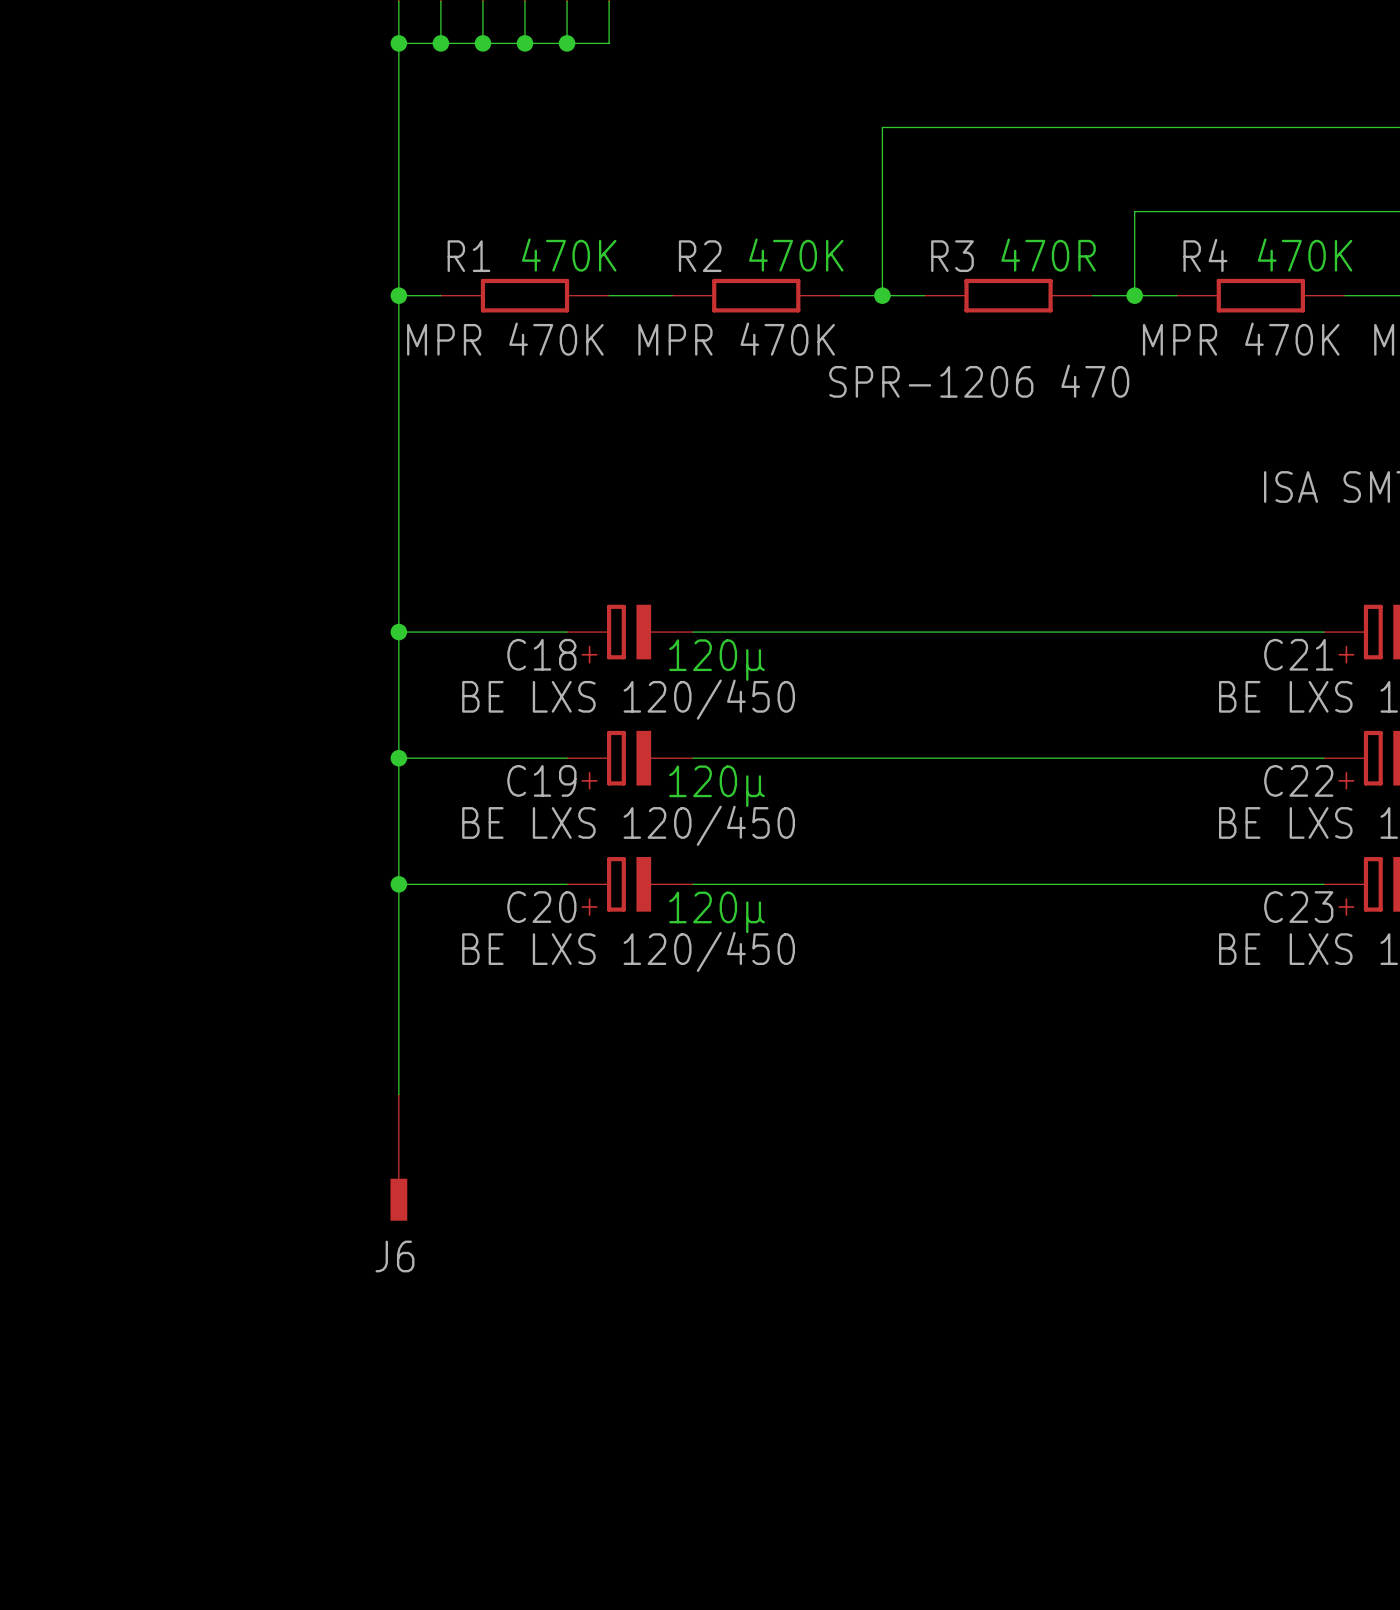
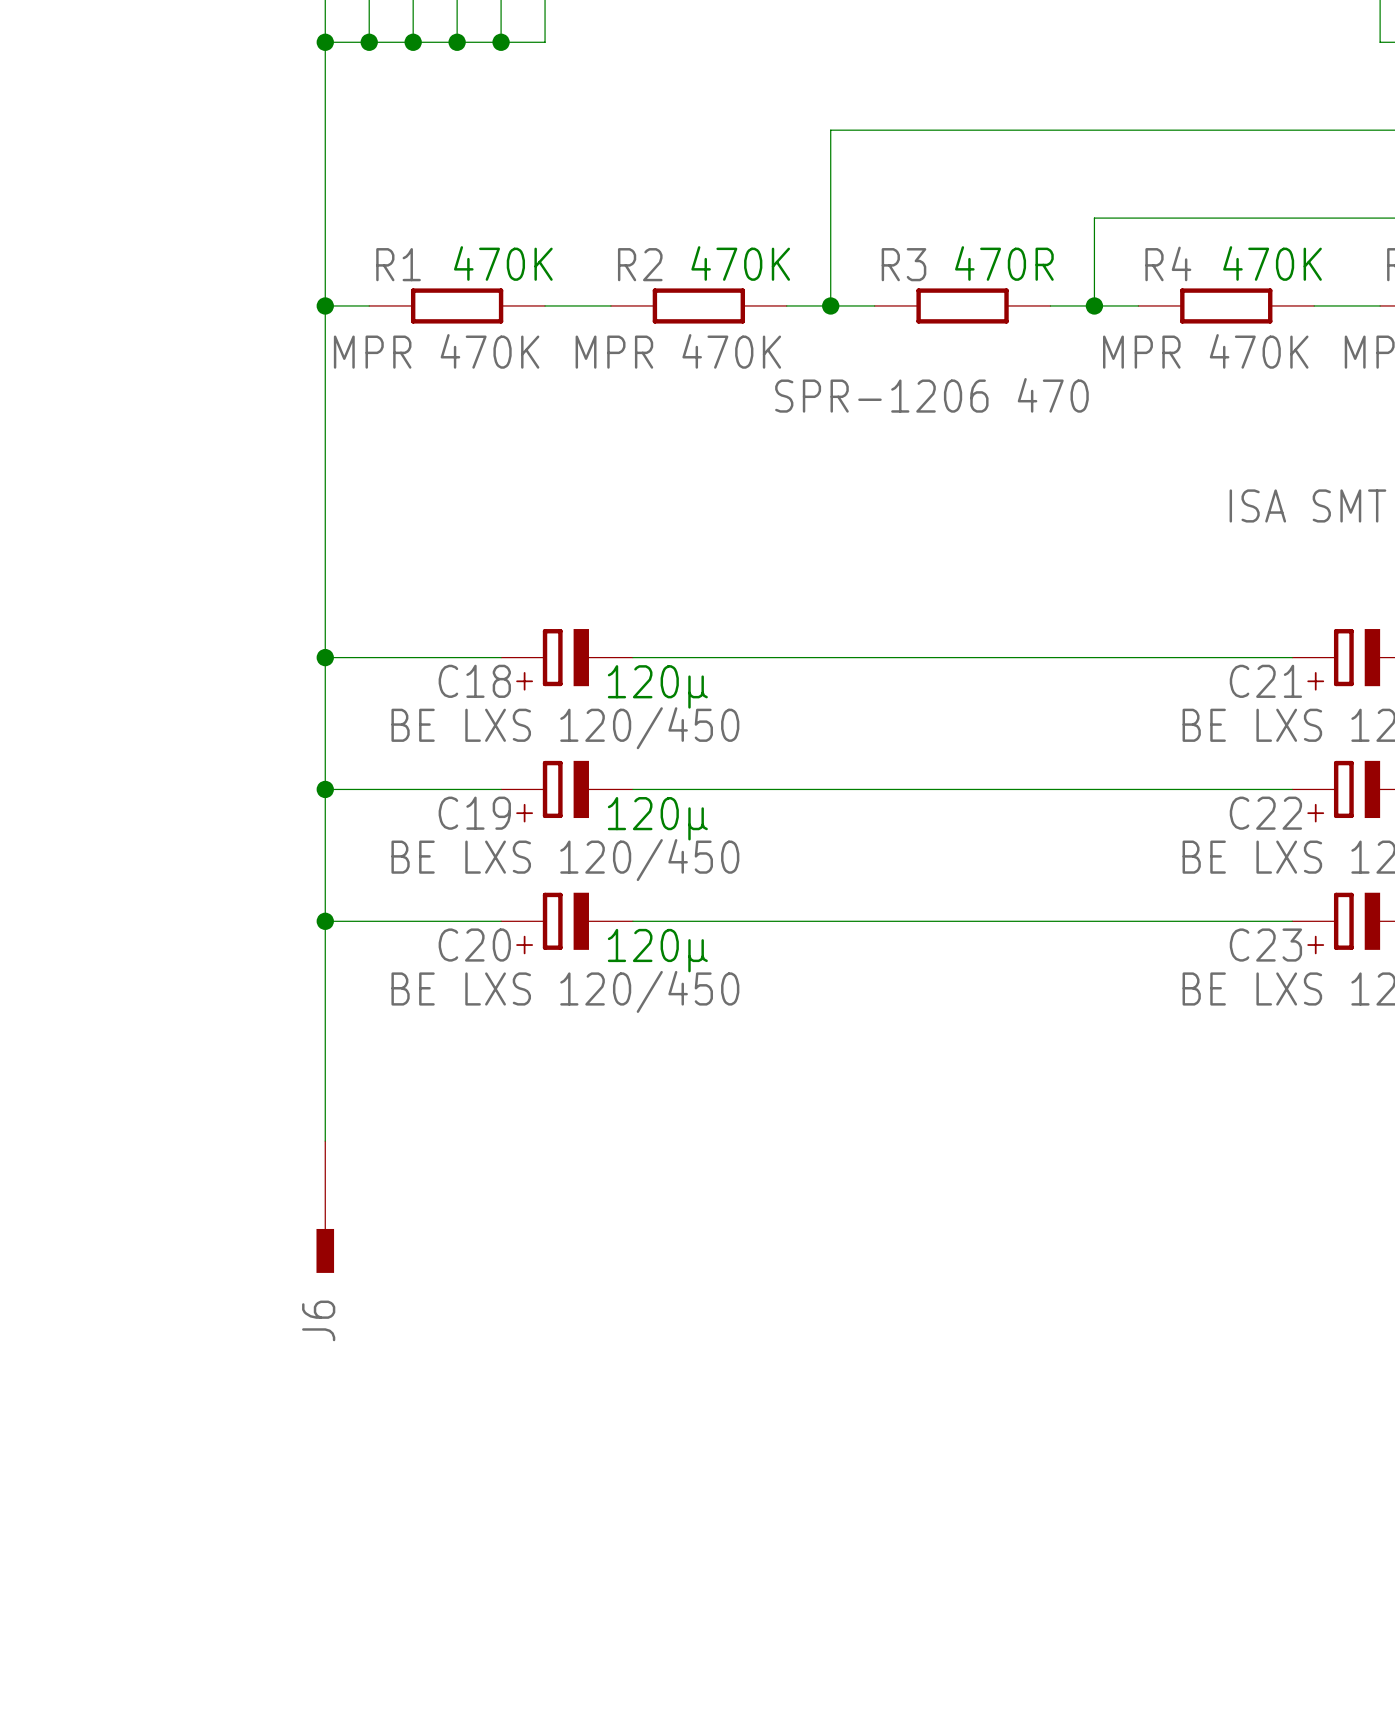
J6 name rotation: 0° (394, 1256) -> 90° counterclockwise (318, 1320)

